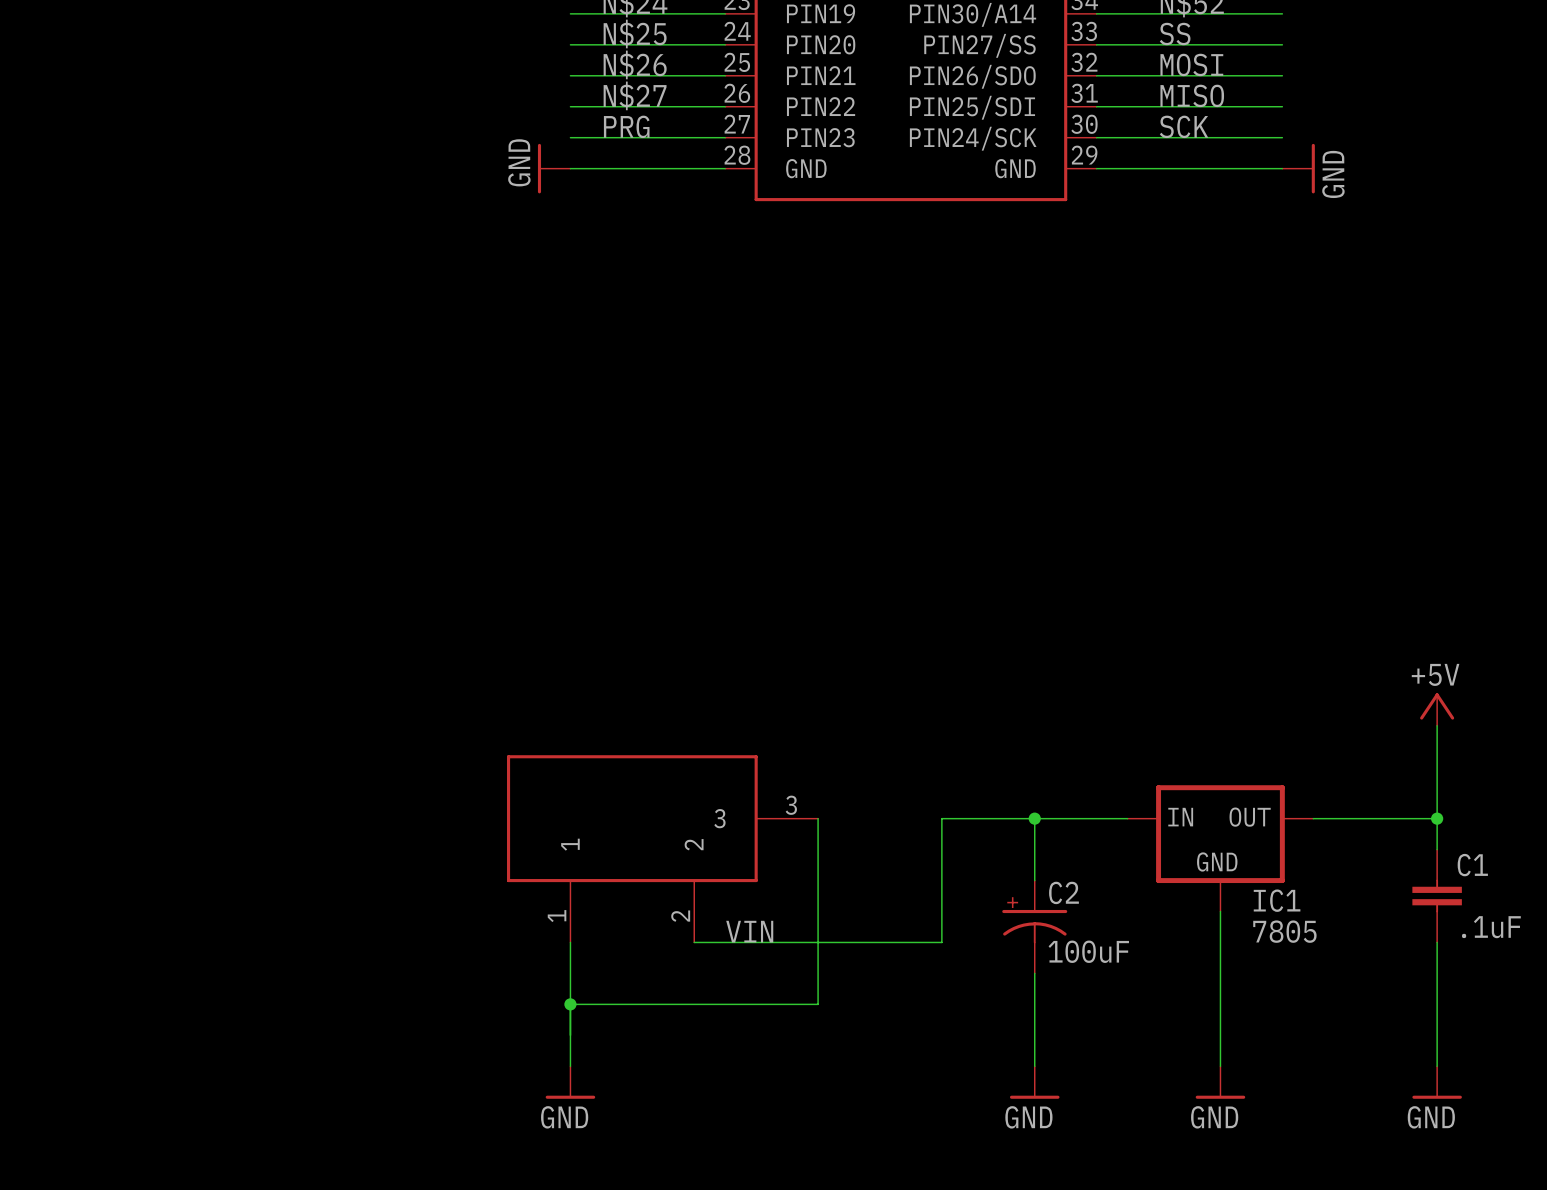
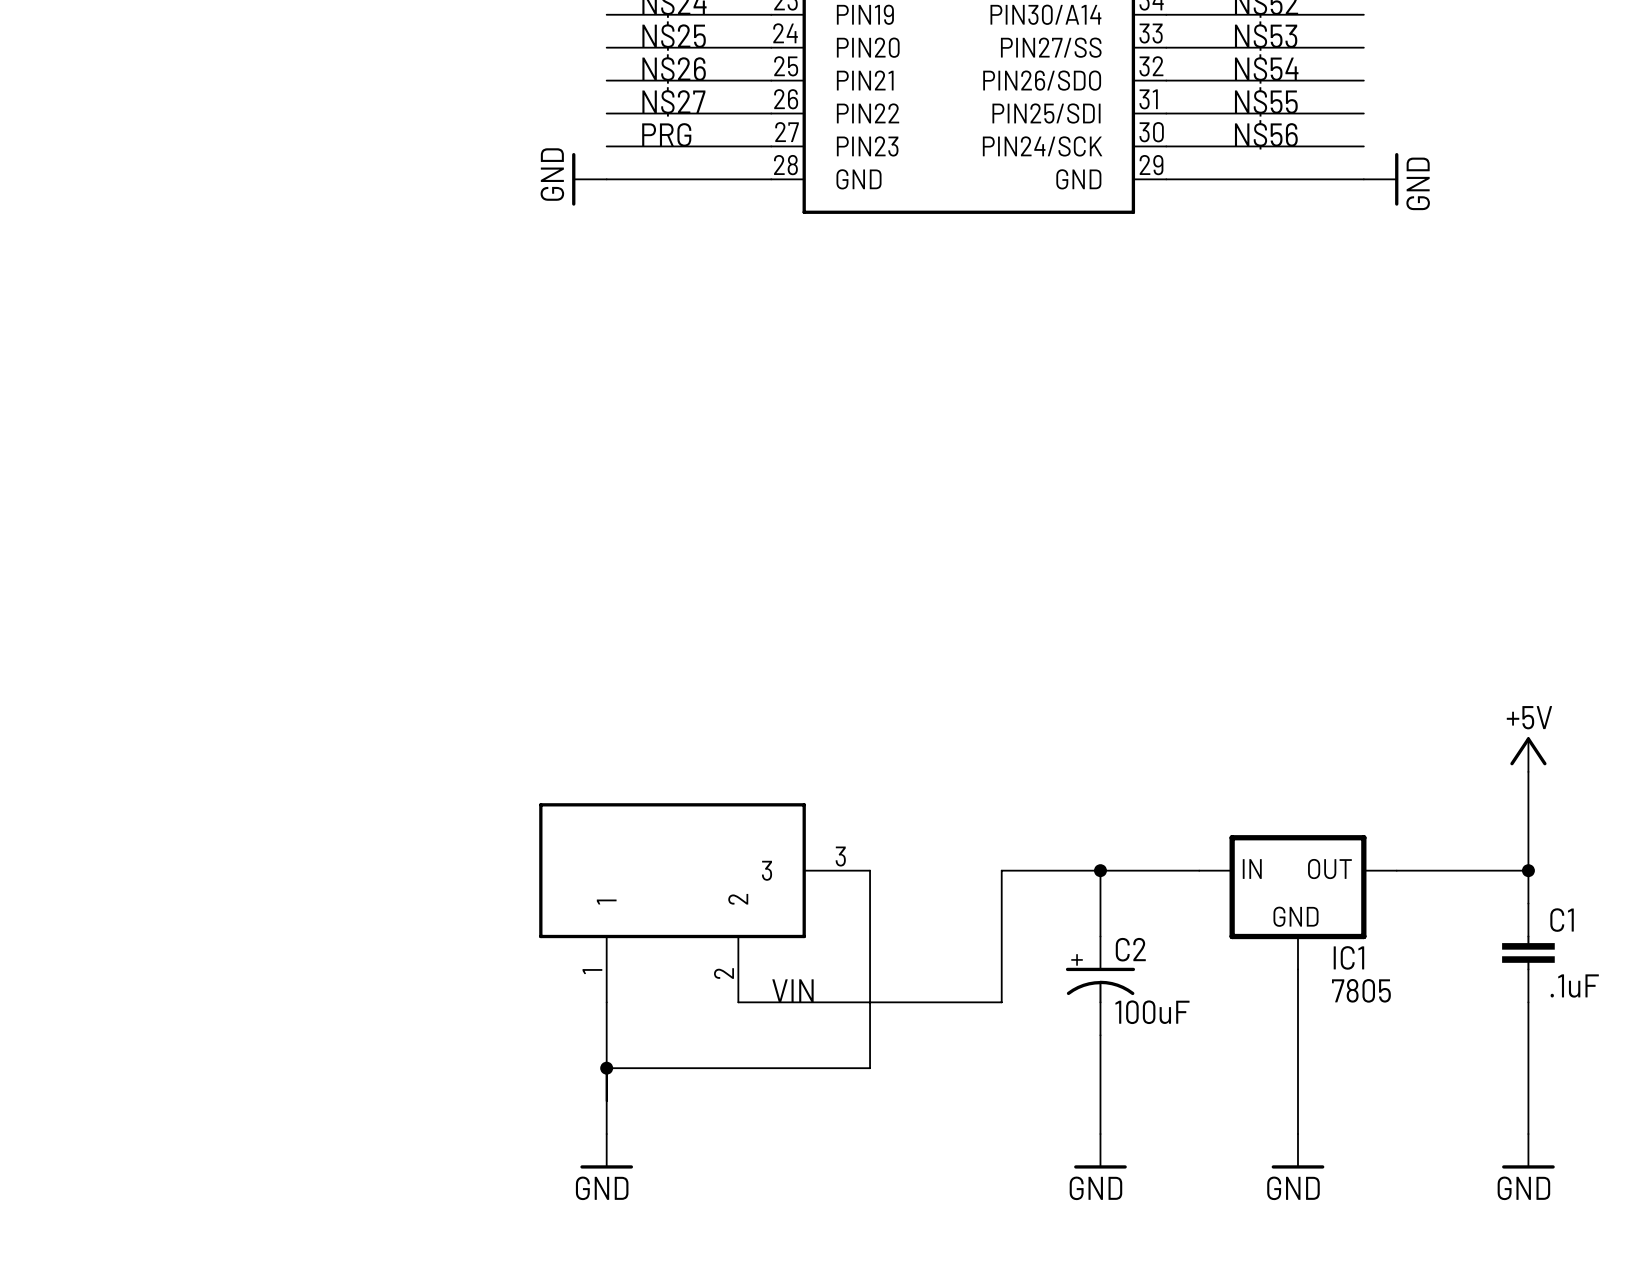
label: SS (1175, 33) -> N$53 (1266, 36)
label: MOSI (1191, 64) -> N$54 (1266, 68)
label: MISO (1192, 95) -> N$55 (1266, 101)
label: SCK (1184, 126) -> N$56 (1266, 134)

